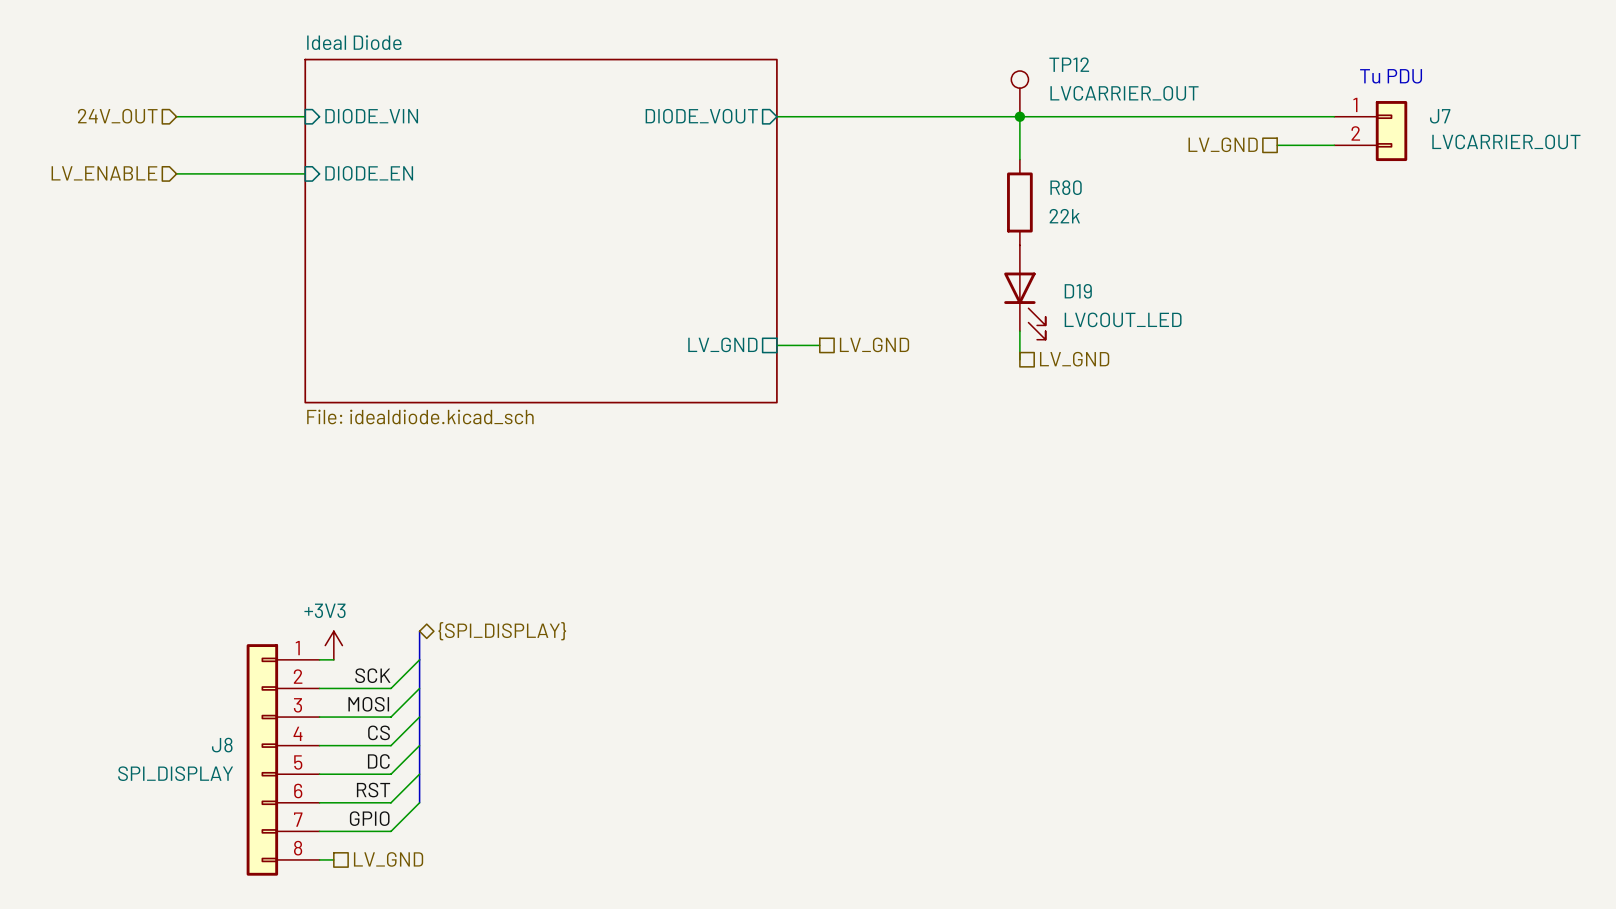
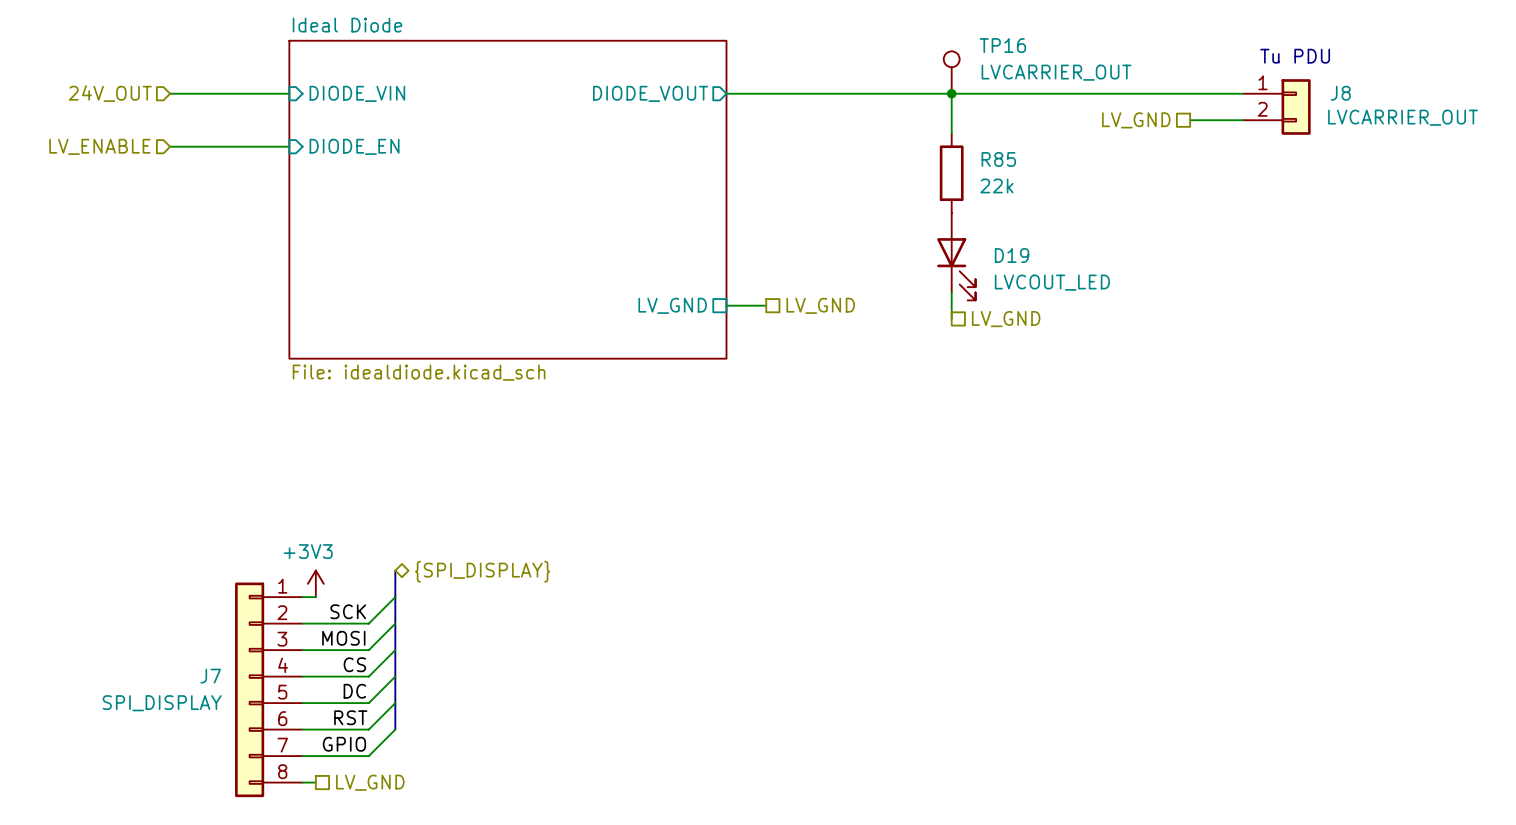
TP12 name: TP12 (1069, 64) -> TP16 (1002, 45)
J7 name: J7 (1440, 116) -> J8 (1340, 93)
R80 name: R80 (1066, 187) -> R85 (998, 159)
J8 name: J8 (222, 745) -> J7 (210, 676)

